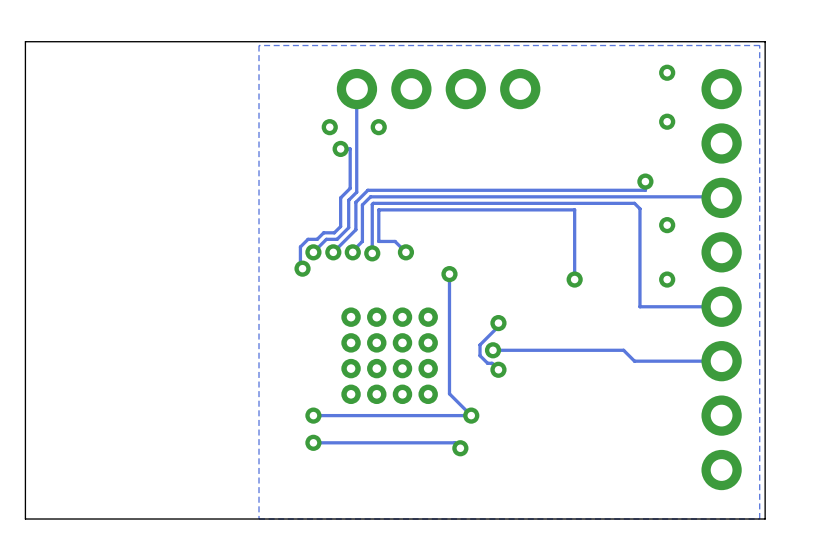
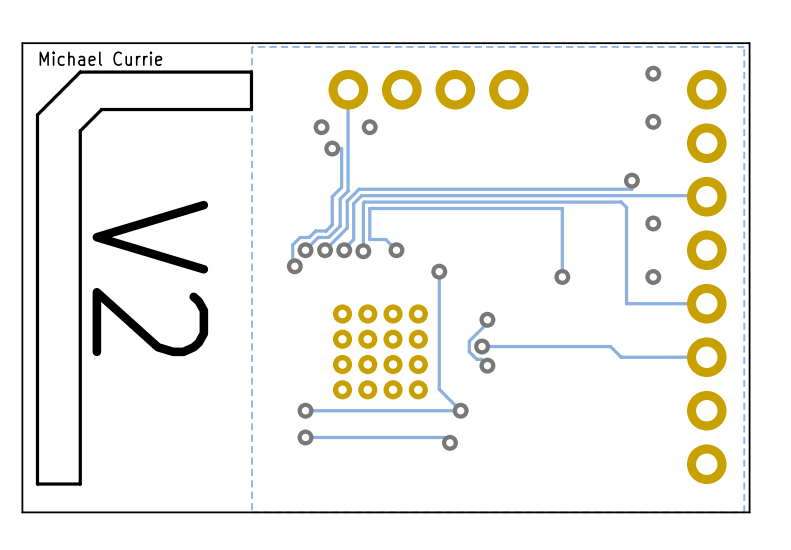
text: none -> Michael Currie (100, 58)
line: none -> (251, 72) (80, 72) (37, 114) (37, 484) (80, 484) (80, 130) (101, 109) (251, 109) (251, 72)
text: none -> V2 (150, 278)

